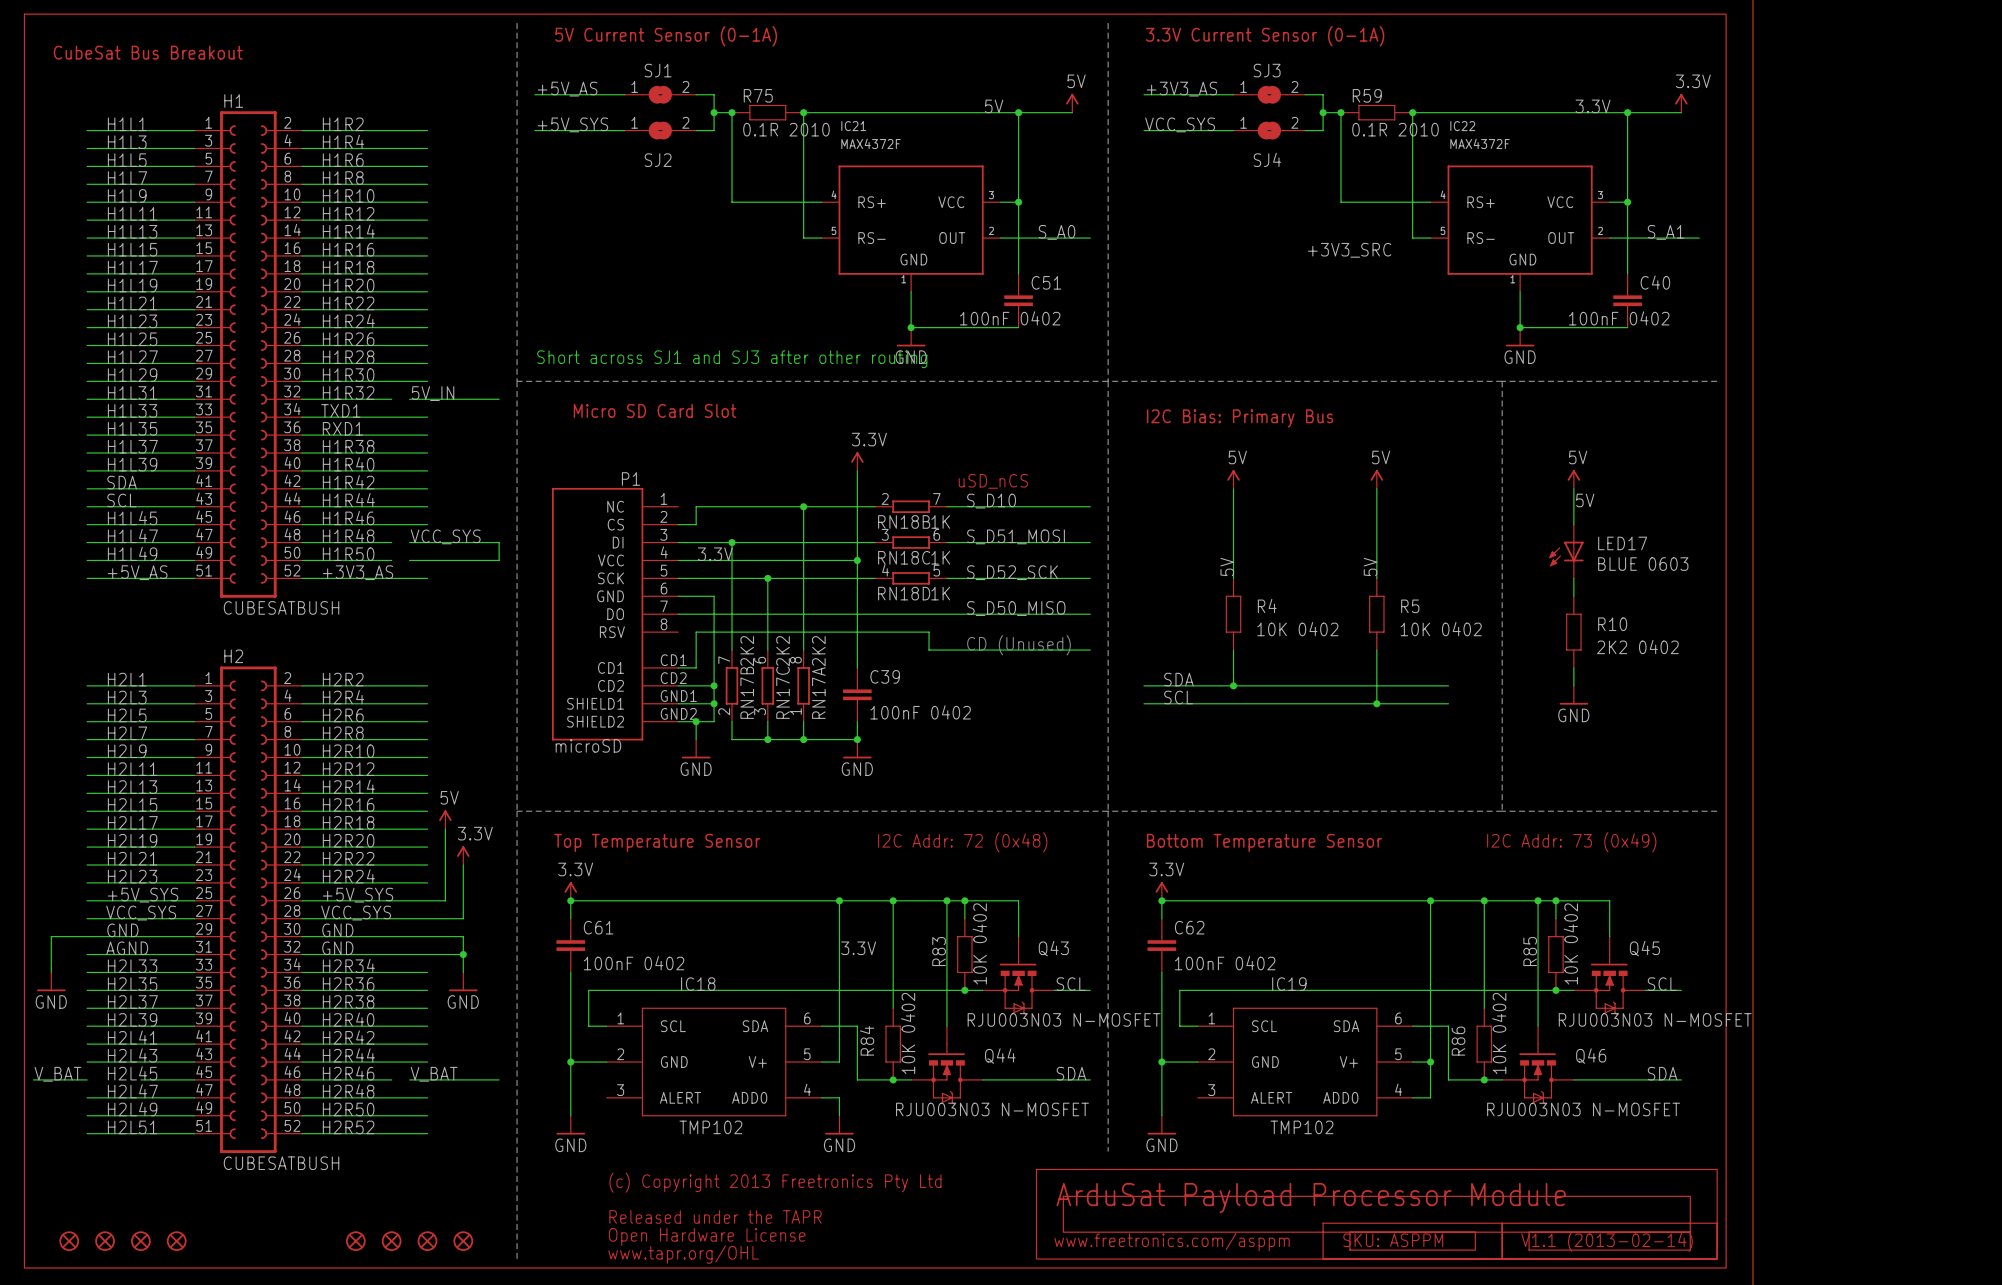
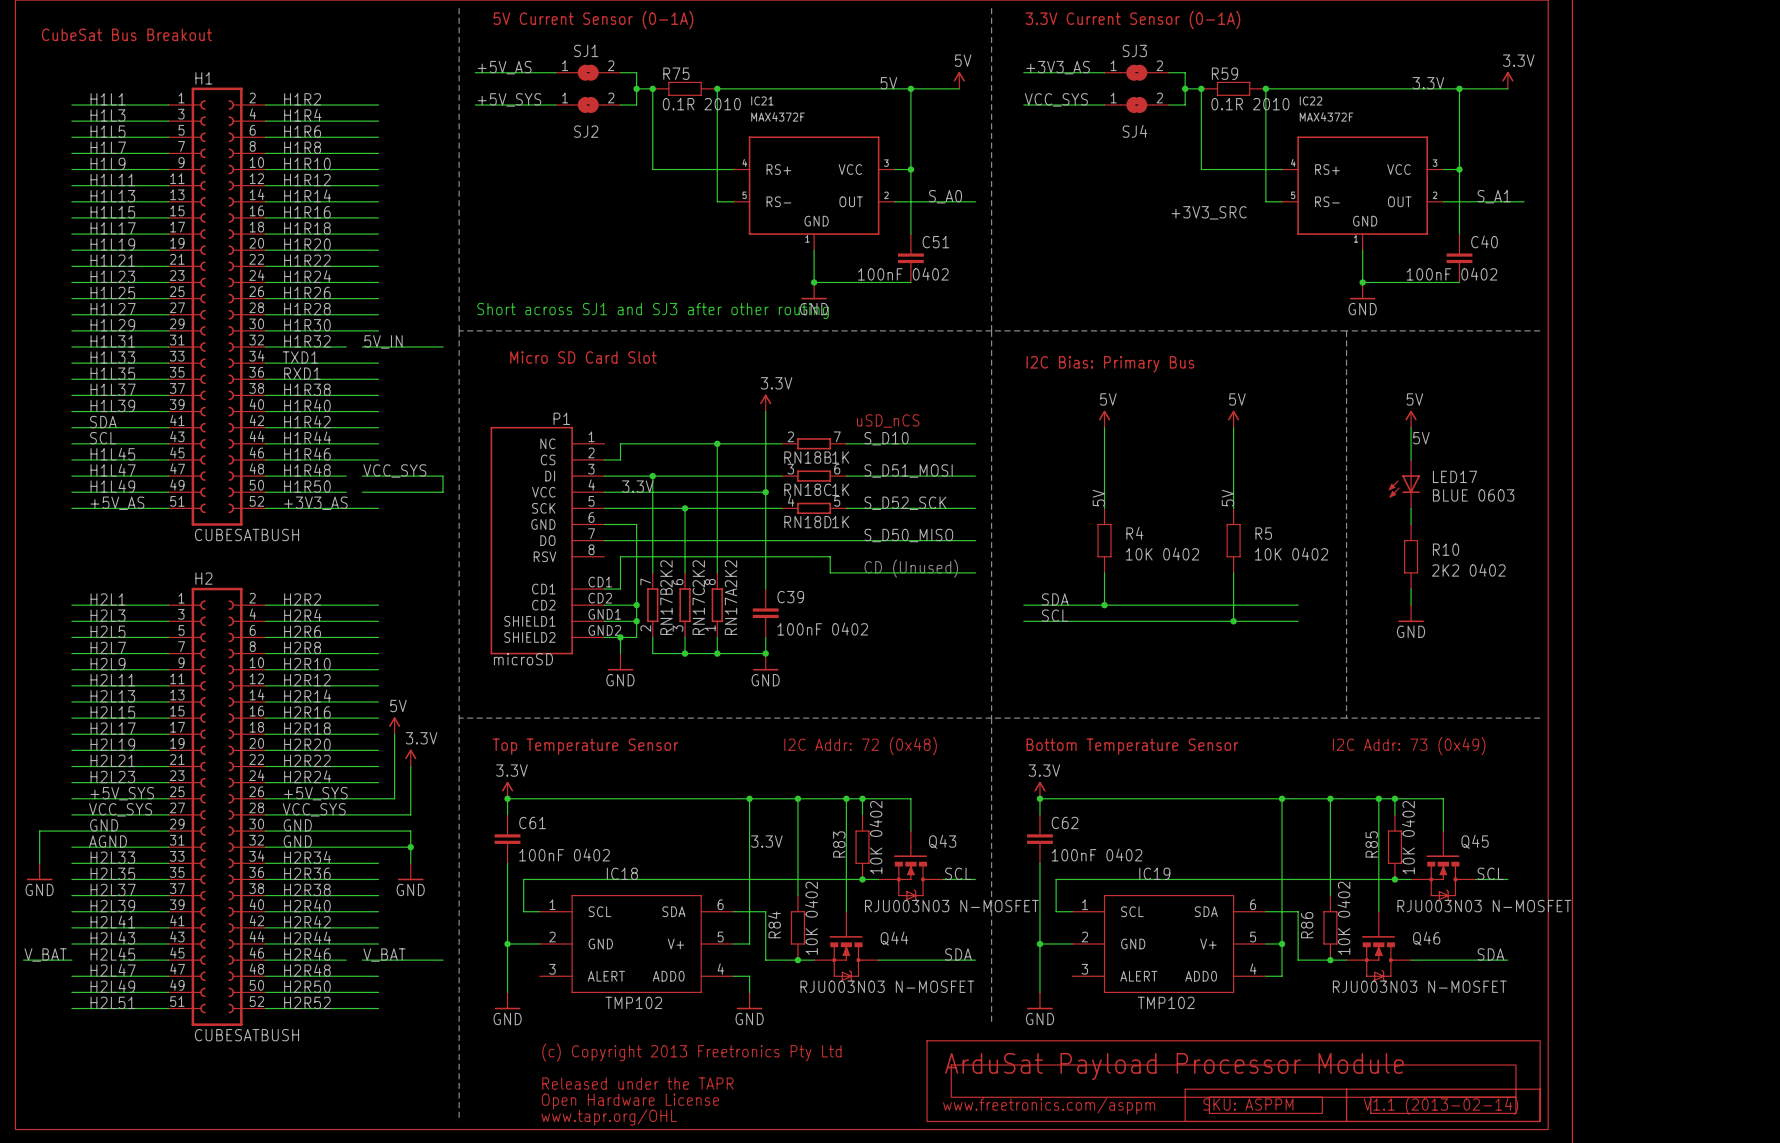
part: (69, 1241) -> none
part: (105, 1241) -> none
part: (140, 1241) -> none
part: (176, 1241) -> none
part: (355, 1241) -> none
part: (391, 1241) -> none
part: (427, 1241) -> none
part: (463, 1241) -> none

